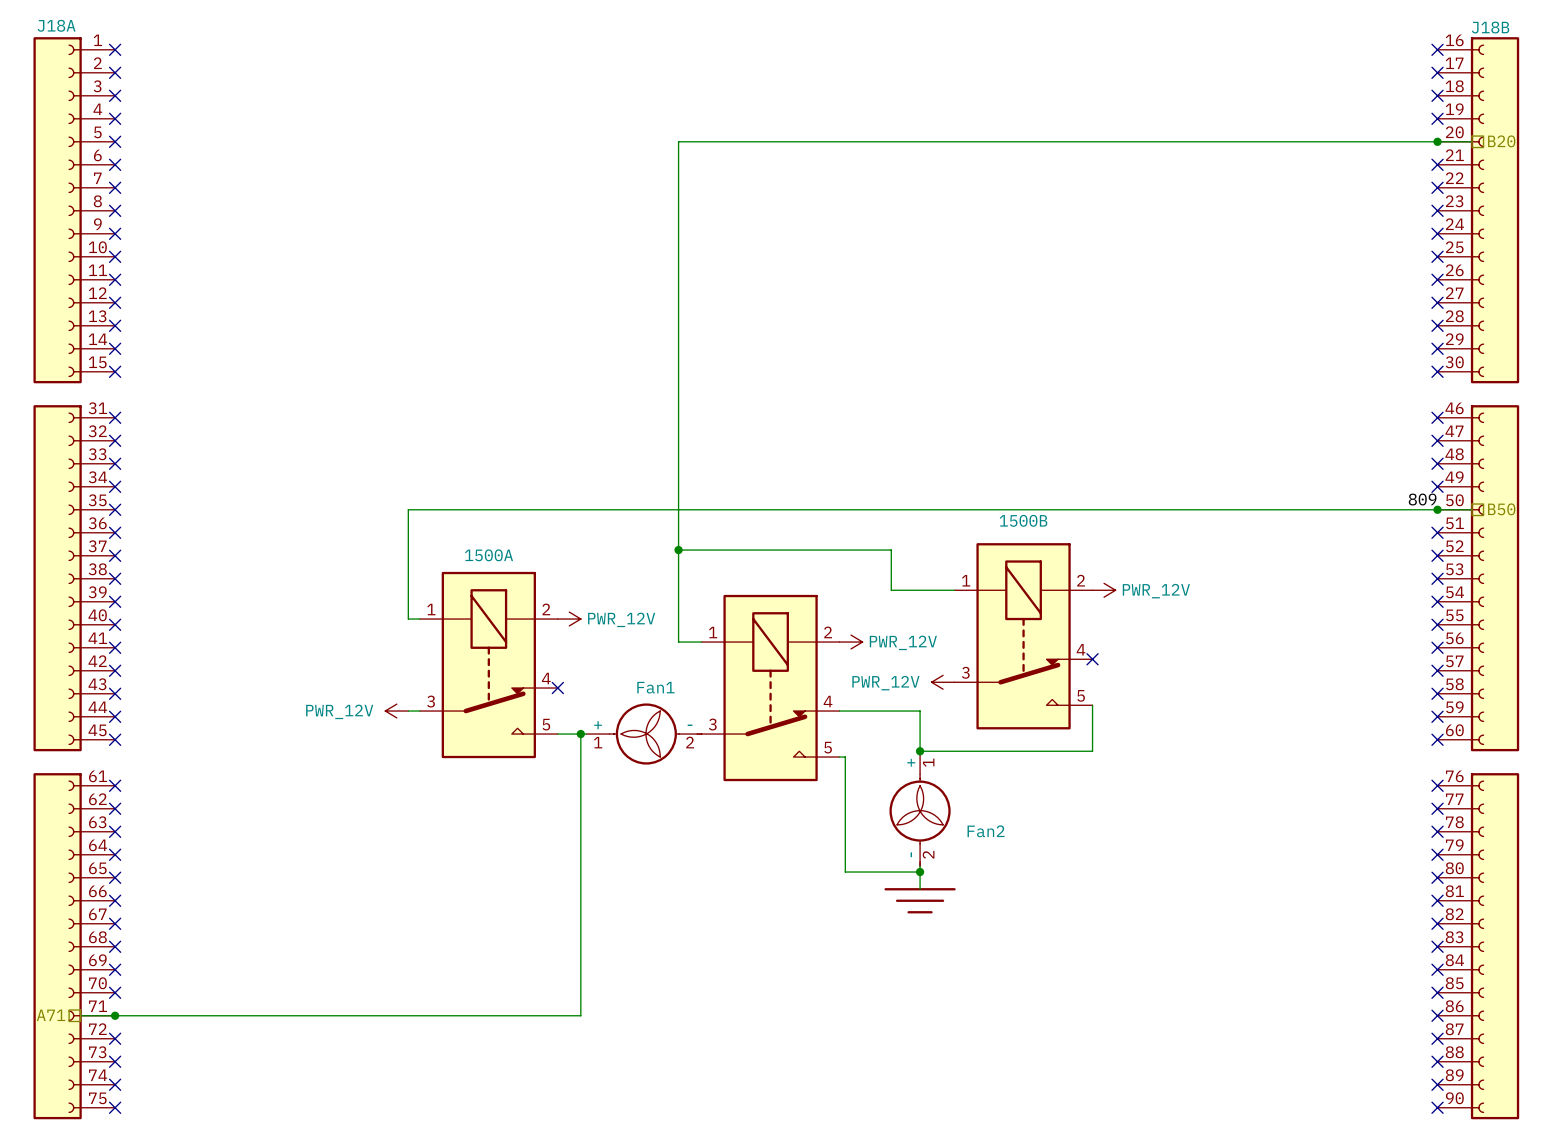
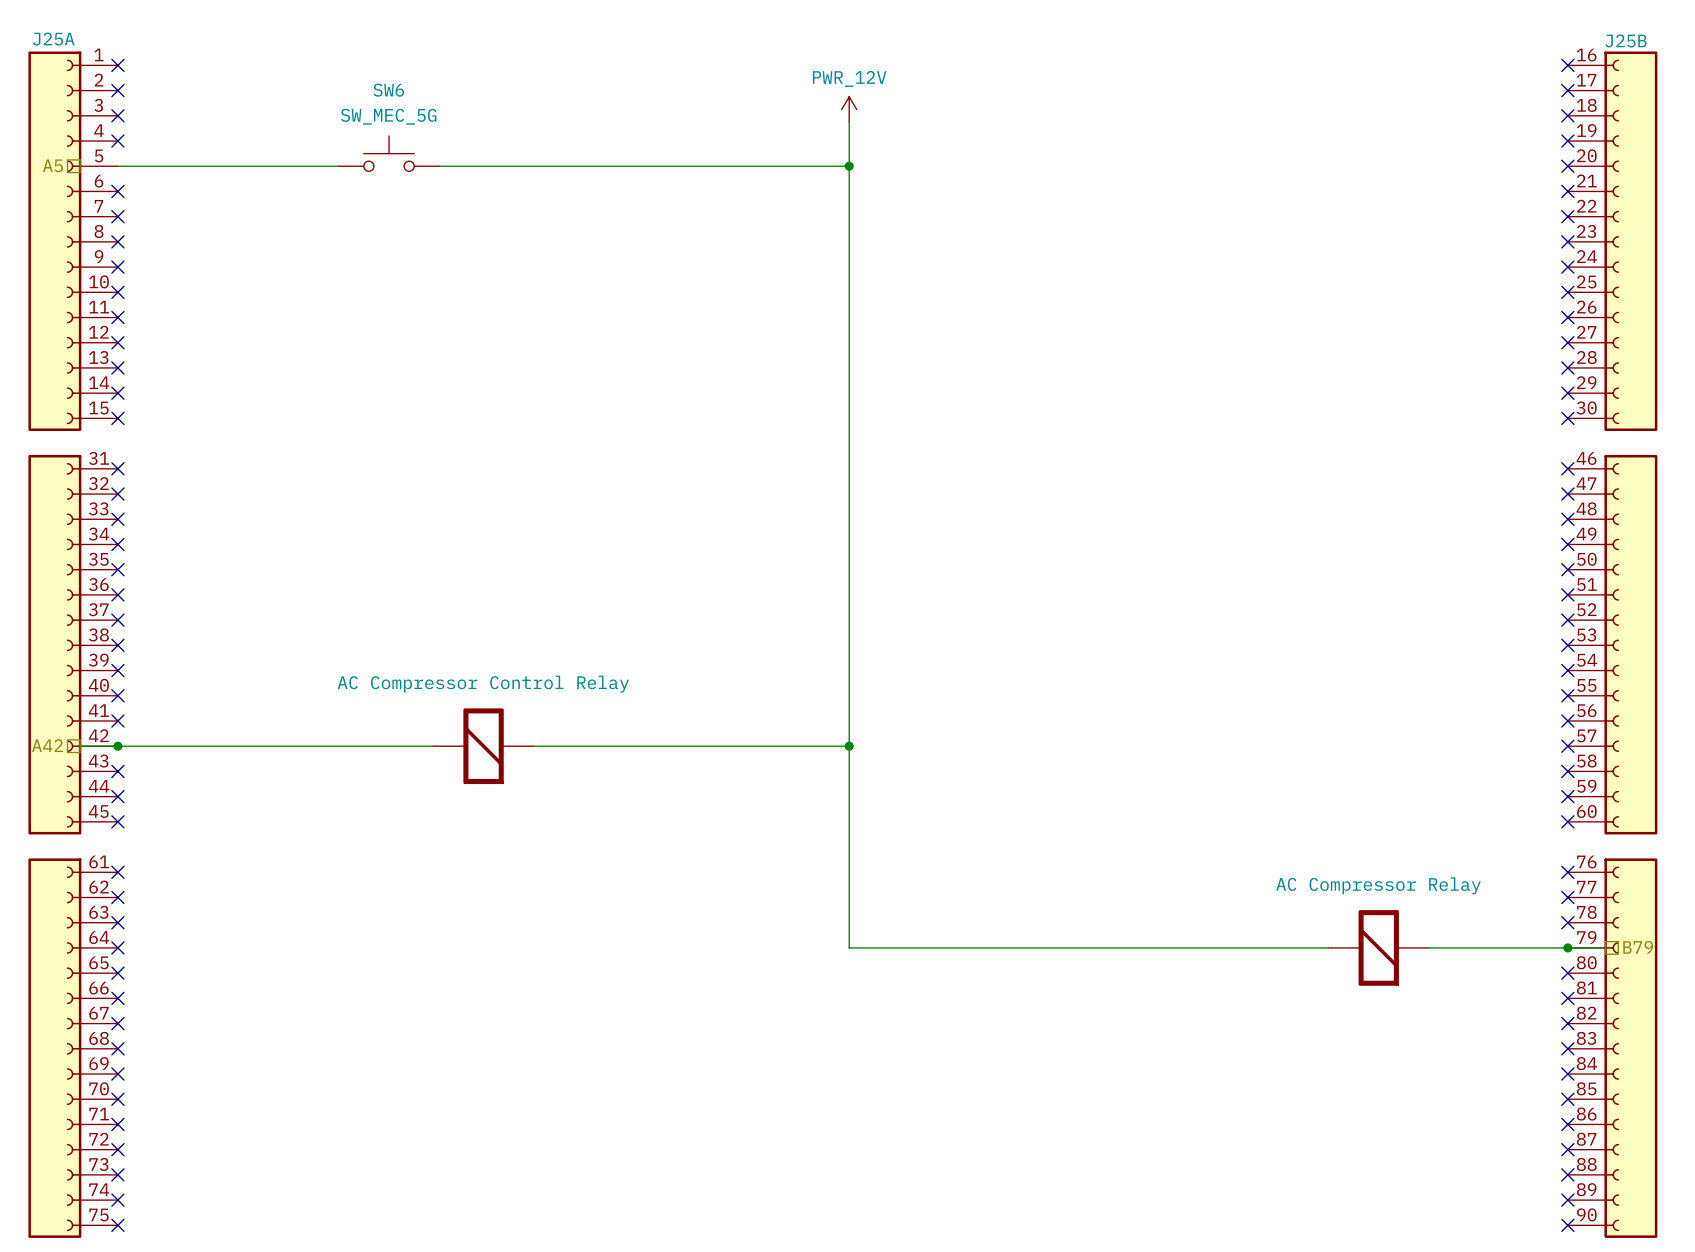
J18A name: J18A (56, 25) -> J25A (53, 39)
J18B name: J18B (1490, 27) -> J25B (1626, 40)
power symbol: none -> PWR_12V (849, 109)
wire: none -> (849, 122) (849, 947) (1328, 947)
SW6: none -> SW_MEC_5G (389, 153)
hierarchical label: none -> A5 (52, 165)
wire: none -> (117, 166) (338, 166)
no-connect mark: (115, 141) -> none
wire: (678, 141) (678, 642) (701, 642) -> (735, 166) (439, 166)
wire: (782, 141) (1472, 141) -> none
junction: none -> (849, 166)
junction: (1437, 141) -> none
no-connect mark: none -> (1567, 166)
hierarchical label: B20 (1501, 141) -> none
label: 809 (1422, 499) -> none
junction: (1437, 509) -> none
no-connect mark: none -> (1567, 569)
wire: (1472, 509) (408, 509) (408, 619) (419, 619) -> none
hierarchical label: B50 (1501, 509) -> none
wire: (678, 550) (891, 550) (891, 590) (954, 590) -> none
junction: (678, 550) -> none
power symbol: PWR_12V (1104, 590) -> none
power symbol: PWR_12V (569, 619) -> none
part: 1500B (1023, 636) -> none
power symbol: PWR_12V (851, 642) -> none
no-connect mark: (1092, 659) -> none
part: 1500A (488, 665) -> none
hierarchical label: none -> A42 (47, 745)
wire: none -> (80, 746) (433, 746)
junction: none -> (117, 746)
no-connect mark: (115, 670) -> none
part: none -> AC Compressor Control Relay (483, 746)
wire: none -> (534, 746) (849, 746)
junction: none -> (849, 746)
power symbol: PWR_12V (943, 682) -> none
no-connect mark: (557, 688) -> none
part: (770, 688) -> none
wire: (1092, 705) (1092, 751) (920, 751) (920, 711) (839, 711) -> none
power symbol: PWR_12V (396, 711) -> none
wire: (408, 711) (419, 711) -> none
wire: (557, 734) (586, 734) -> none
wire: (580, 734) (580, 1015) (80, 1015) -> none
junction: (580, 734) -> none
part: Fan1 (644, 734) -> none
junction: (920, 751) -> none
wire: (839, 757) (845, 757) (845, 872) (920, 872) -> none
part: Fan2 (920, 808) -> none
part: none -> AC Compressor Relay (1378, 947)
wire: none -> (1429, 947) (1605, 947)
junction: none -> (1567, 947)
no-connect mark: (1437, 854) -> none
hierarchical label: none -> B79 (1638, 947)
wire: (920, 866) (920, 889) -> none
junction: (920, 872) -> none
power symbol: (920, 900) -> none
hierarchical label: A71 (51, 1015) -> none
junction: (115, 1015) -> none
no-connect mark: none -> (117, 1124)

